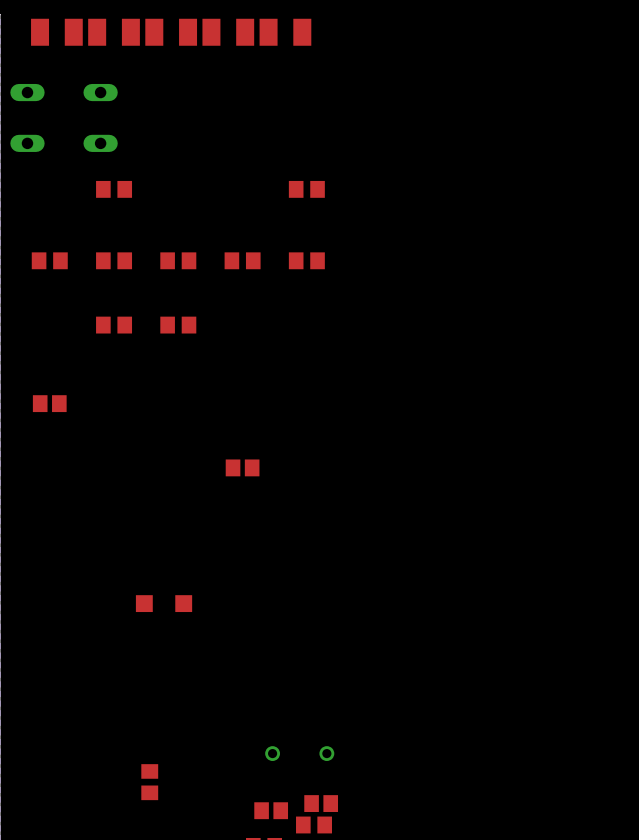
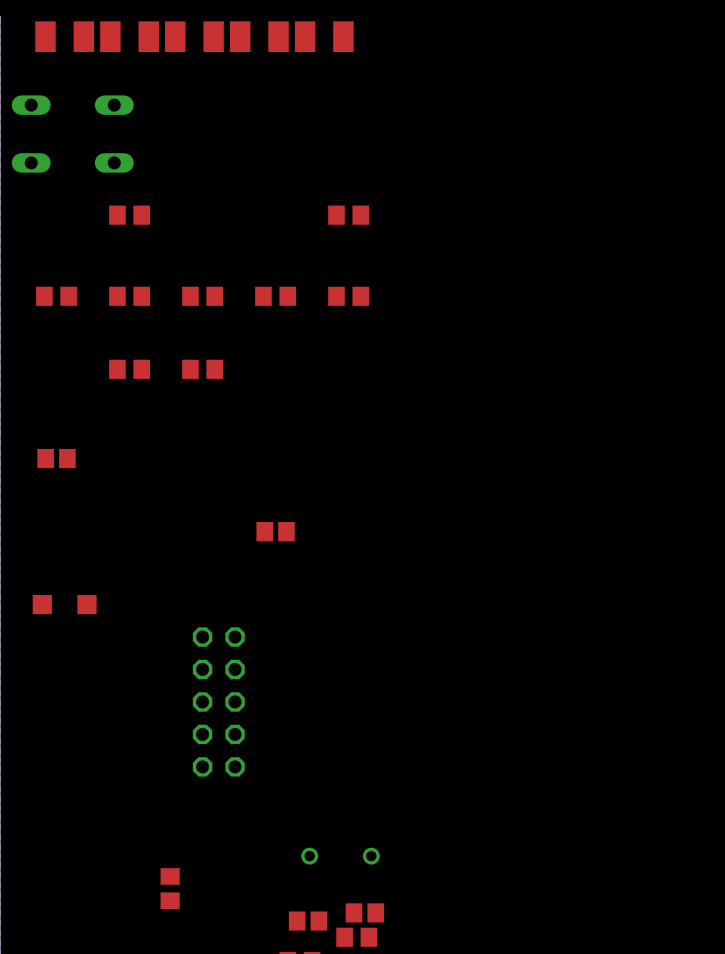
part position: (164, 603) -> (64, 604)
part: none -> (218, 701)

